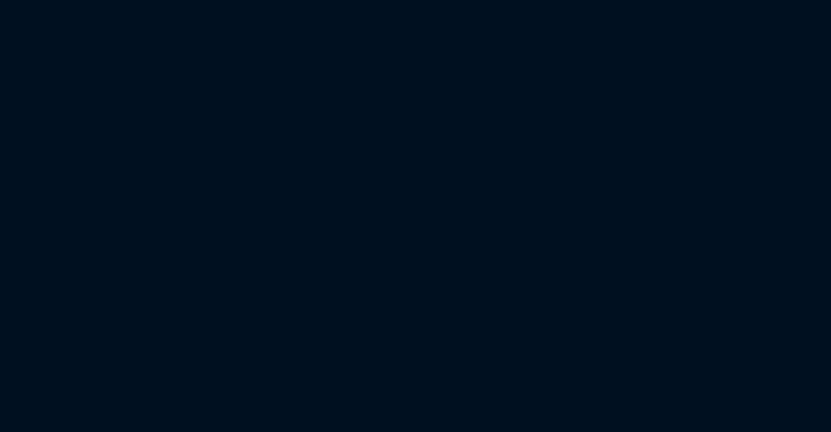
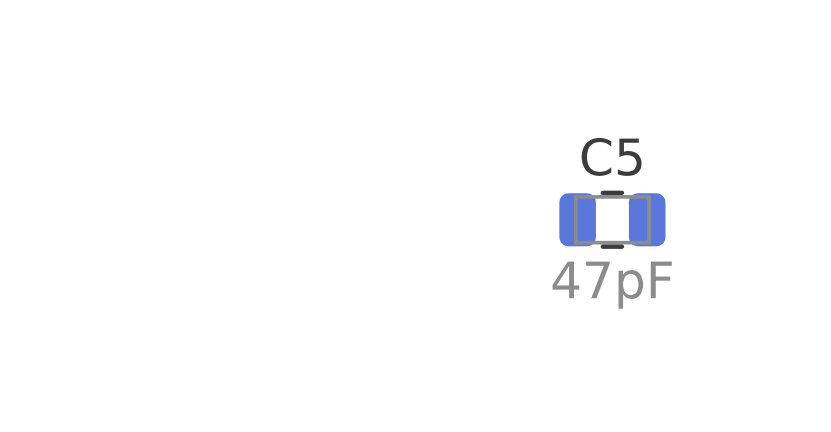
C5: none -> 47pF (612, 219)

